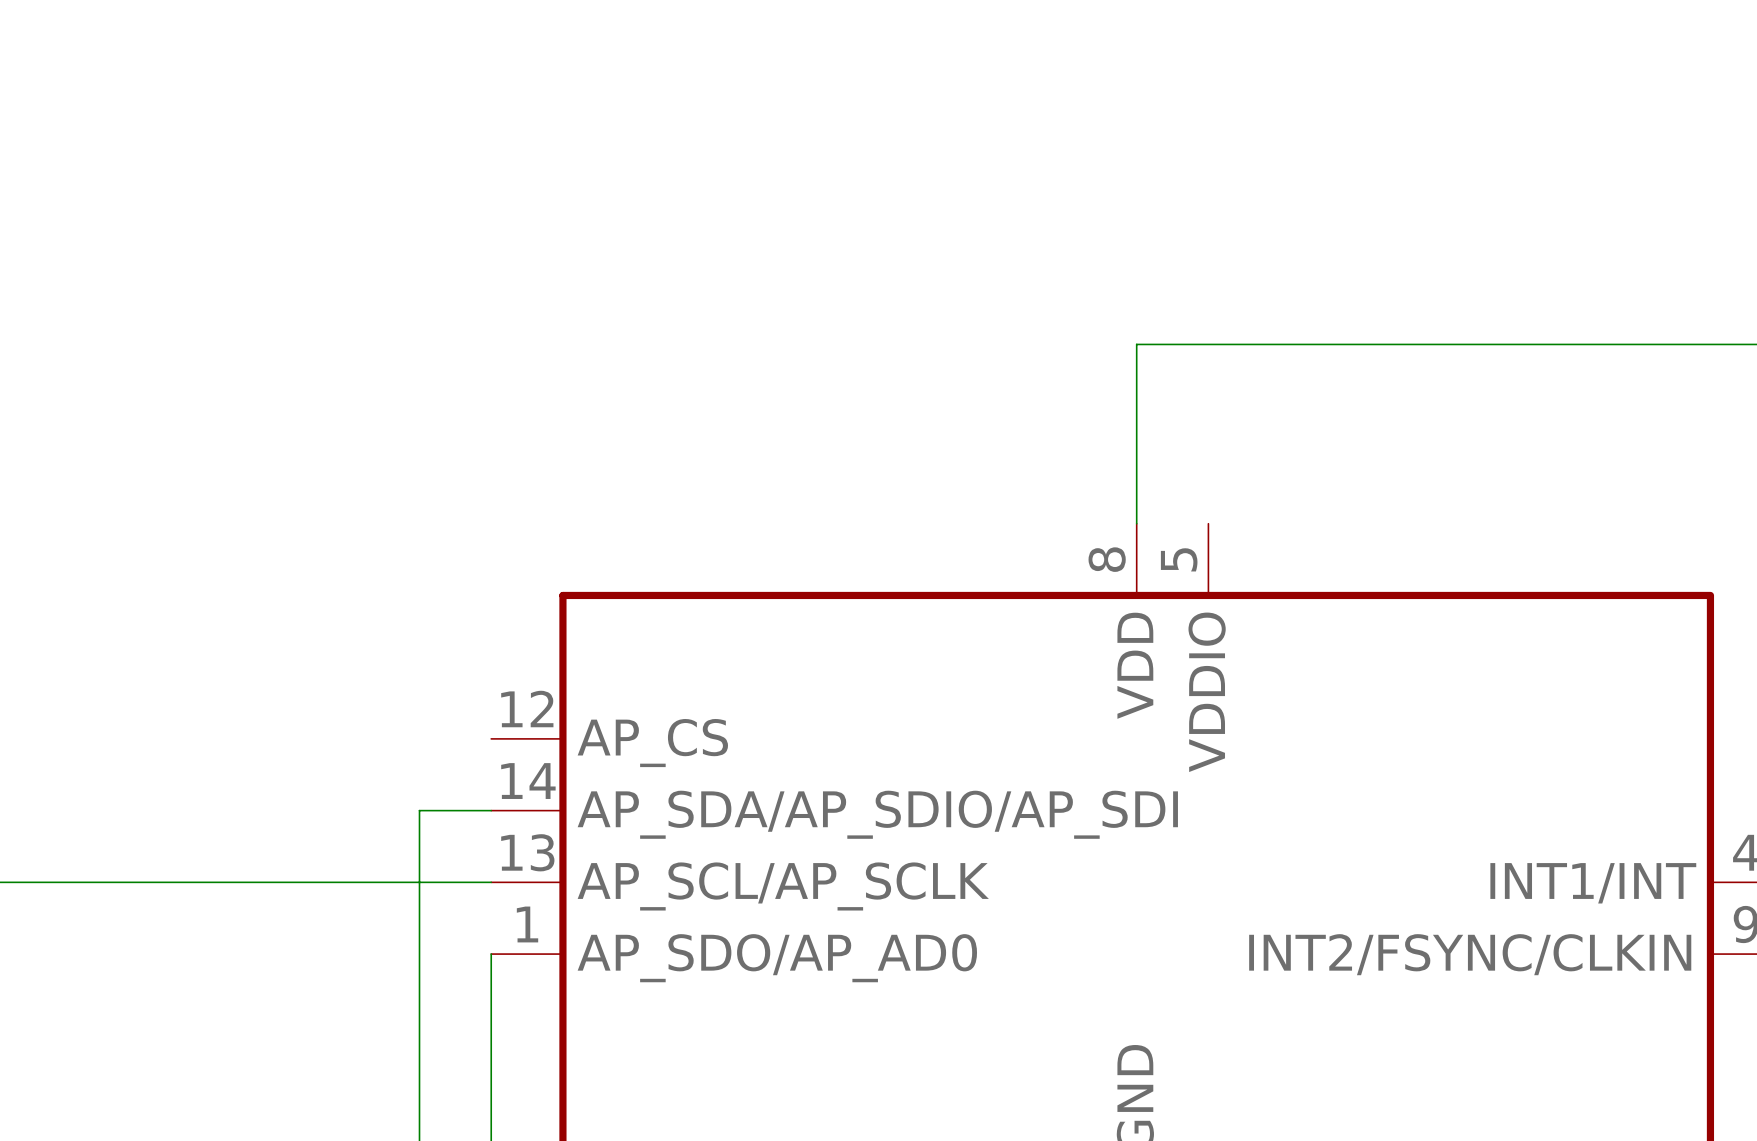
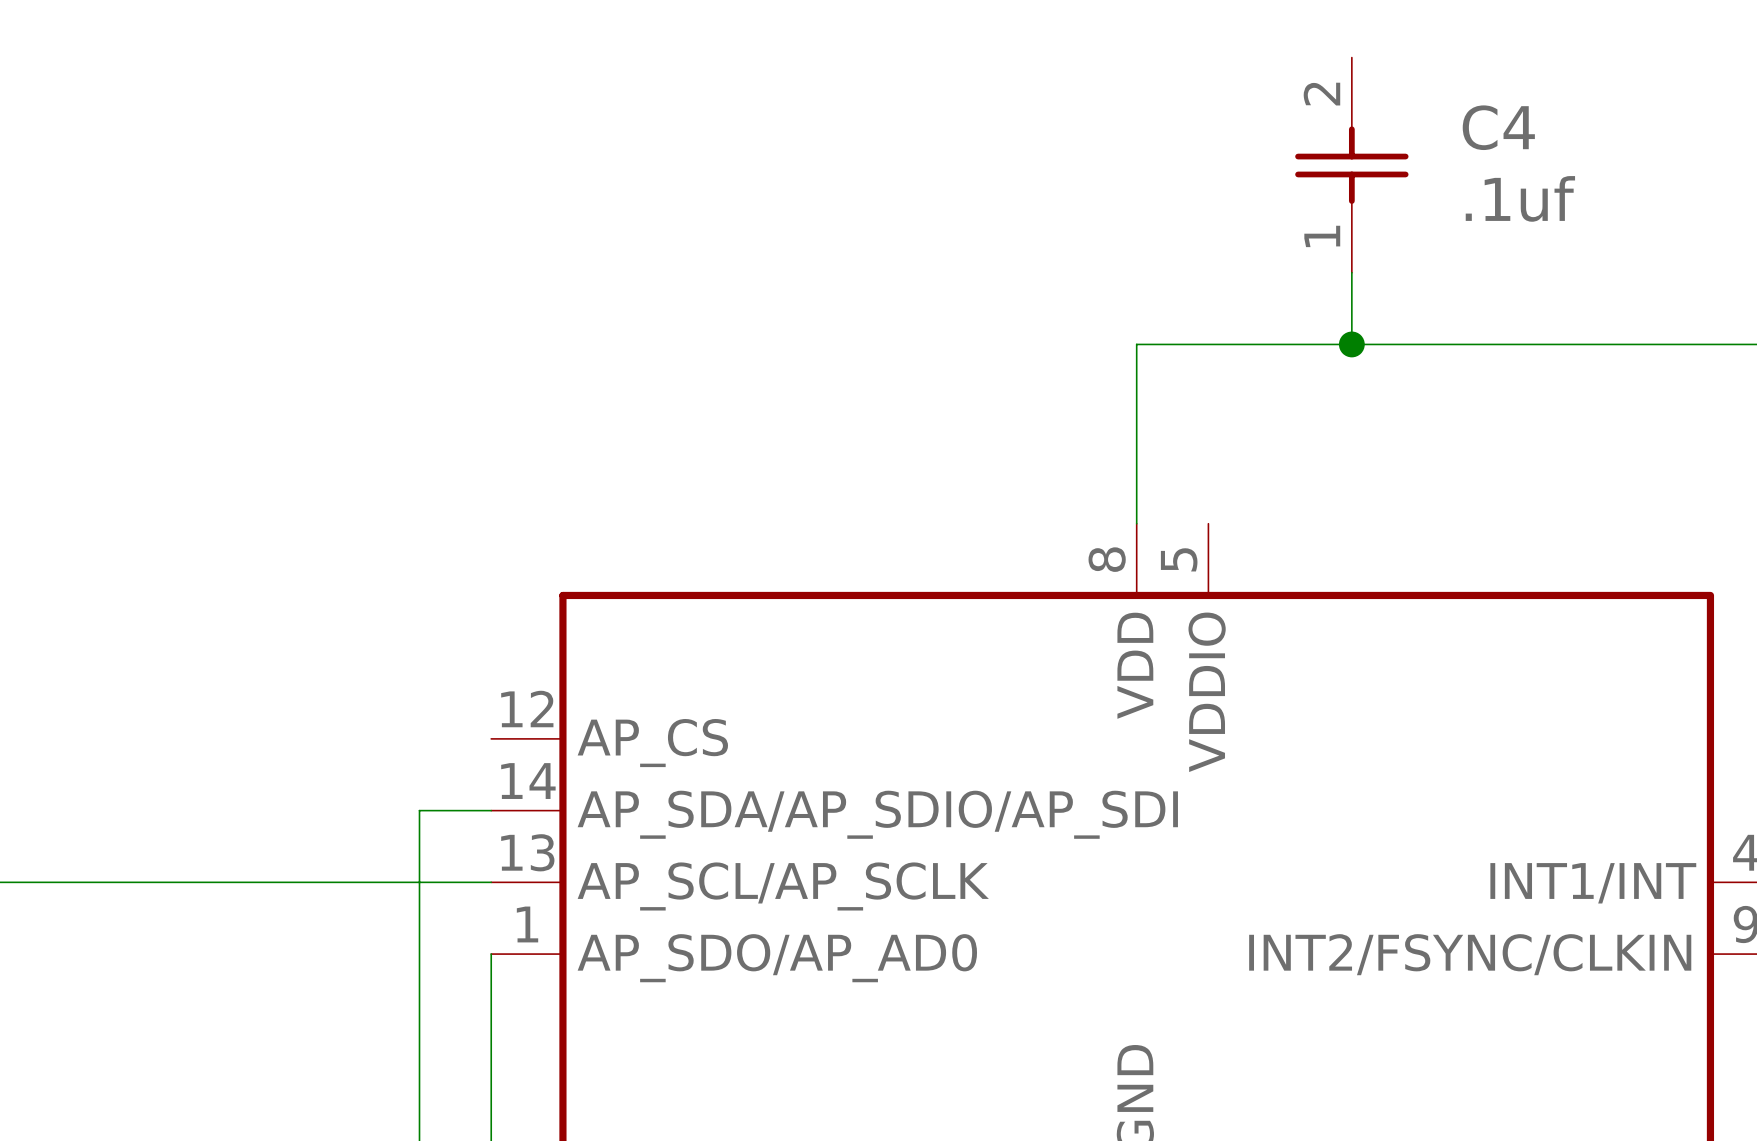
C4: none -> .1uf (1351, 165)
wire: none -> (1351, 272) (1351, 344)
junction: none -> (1351, 344)

